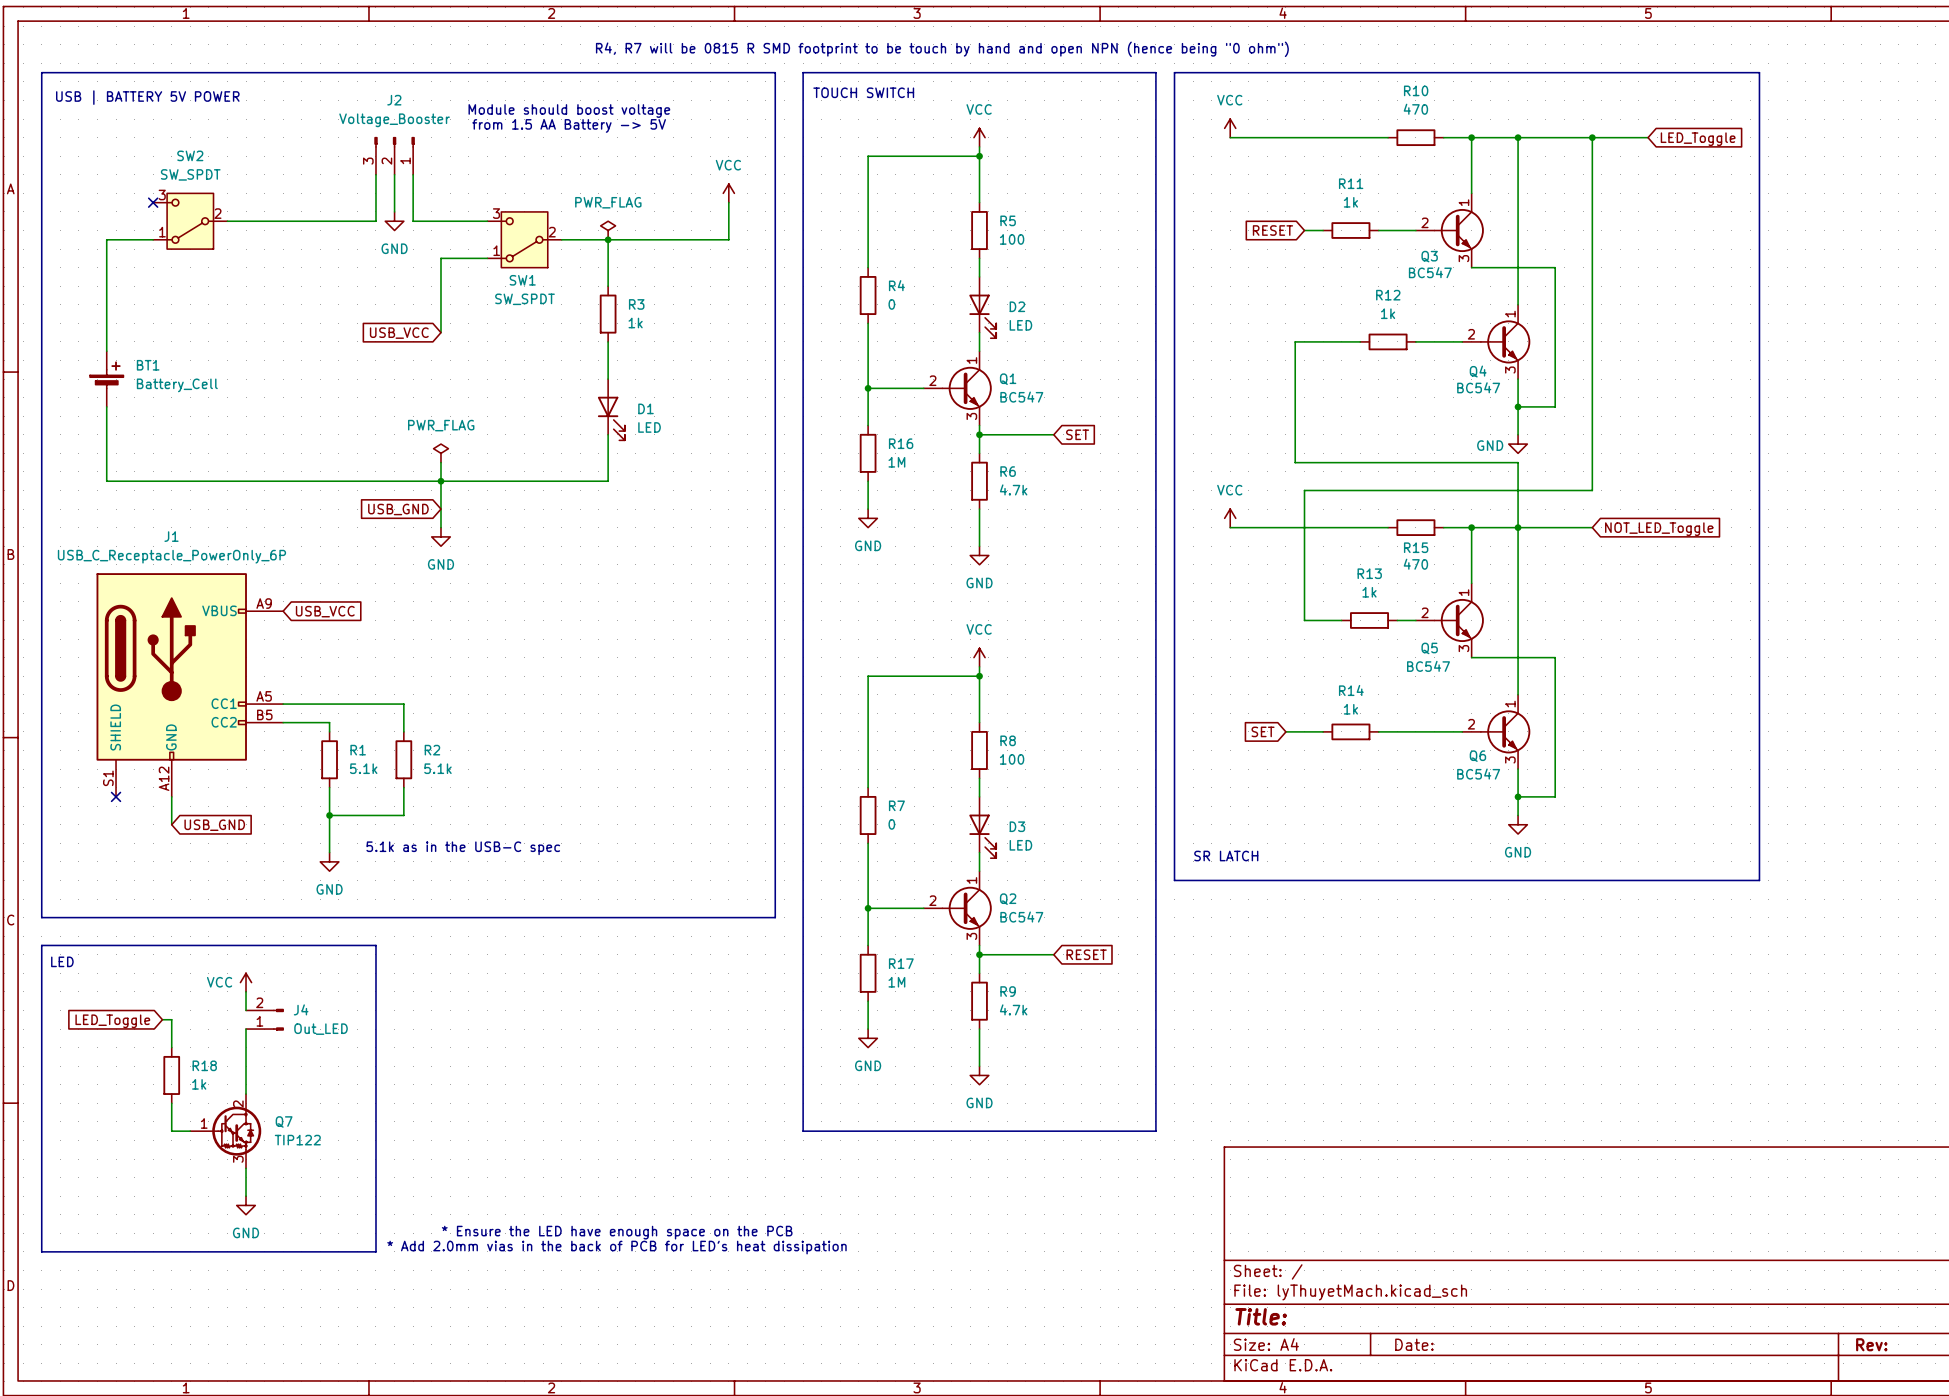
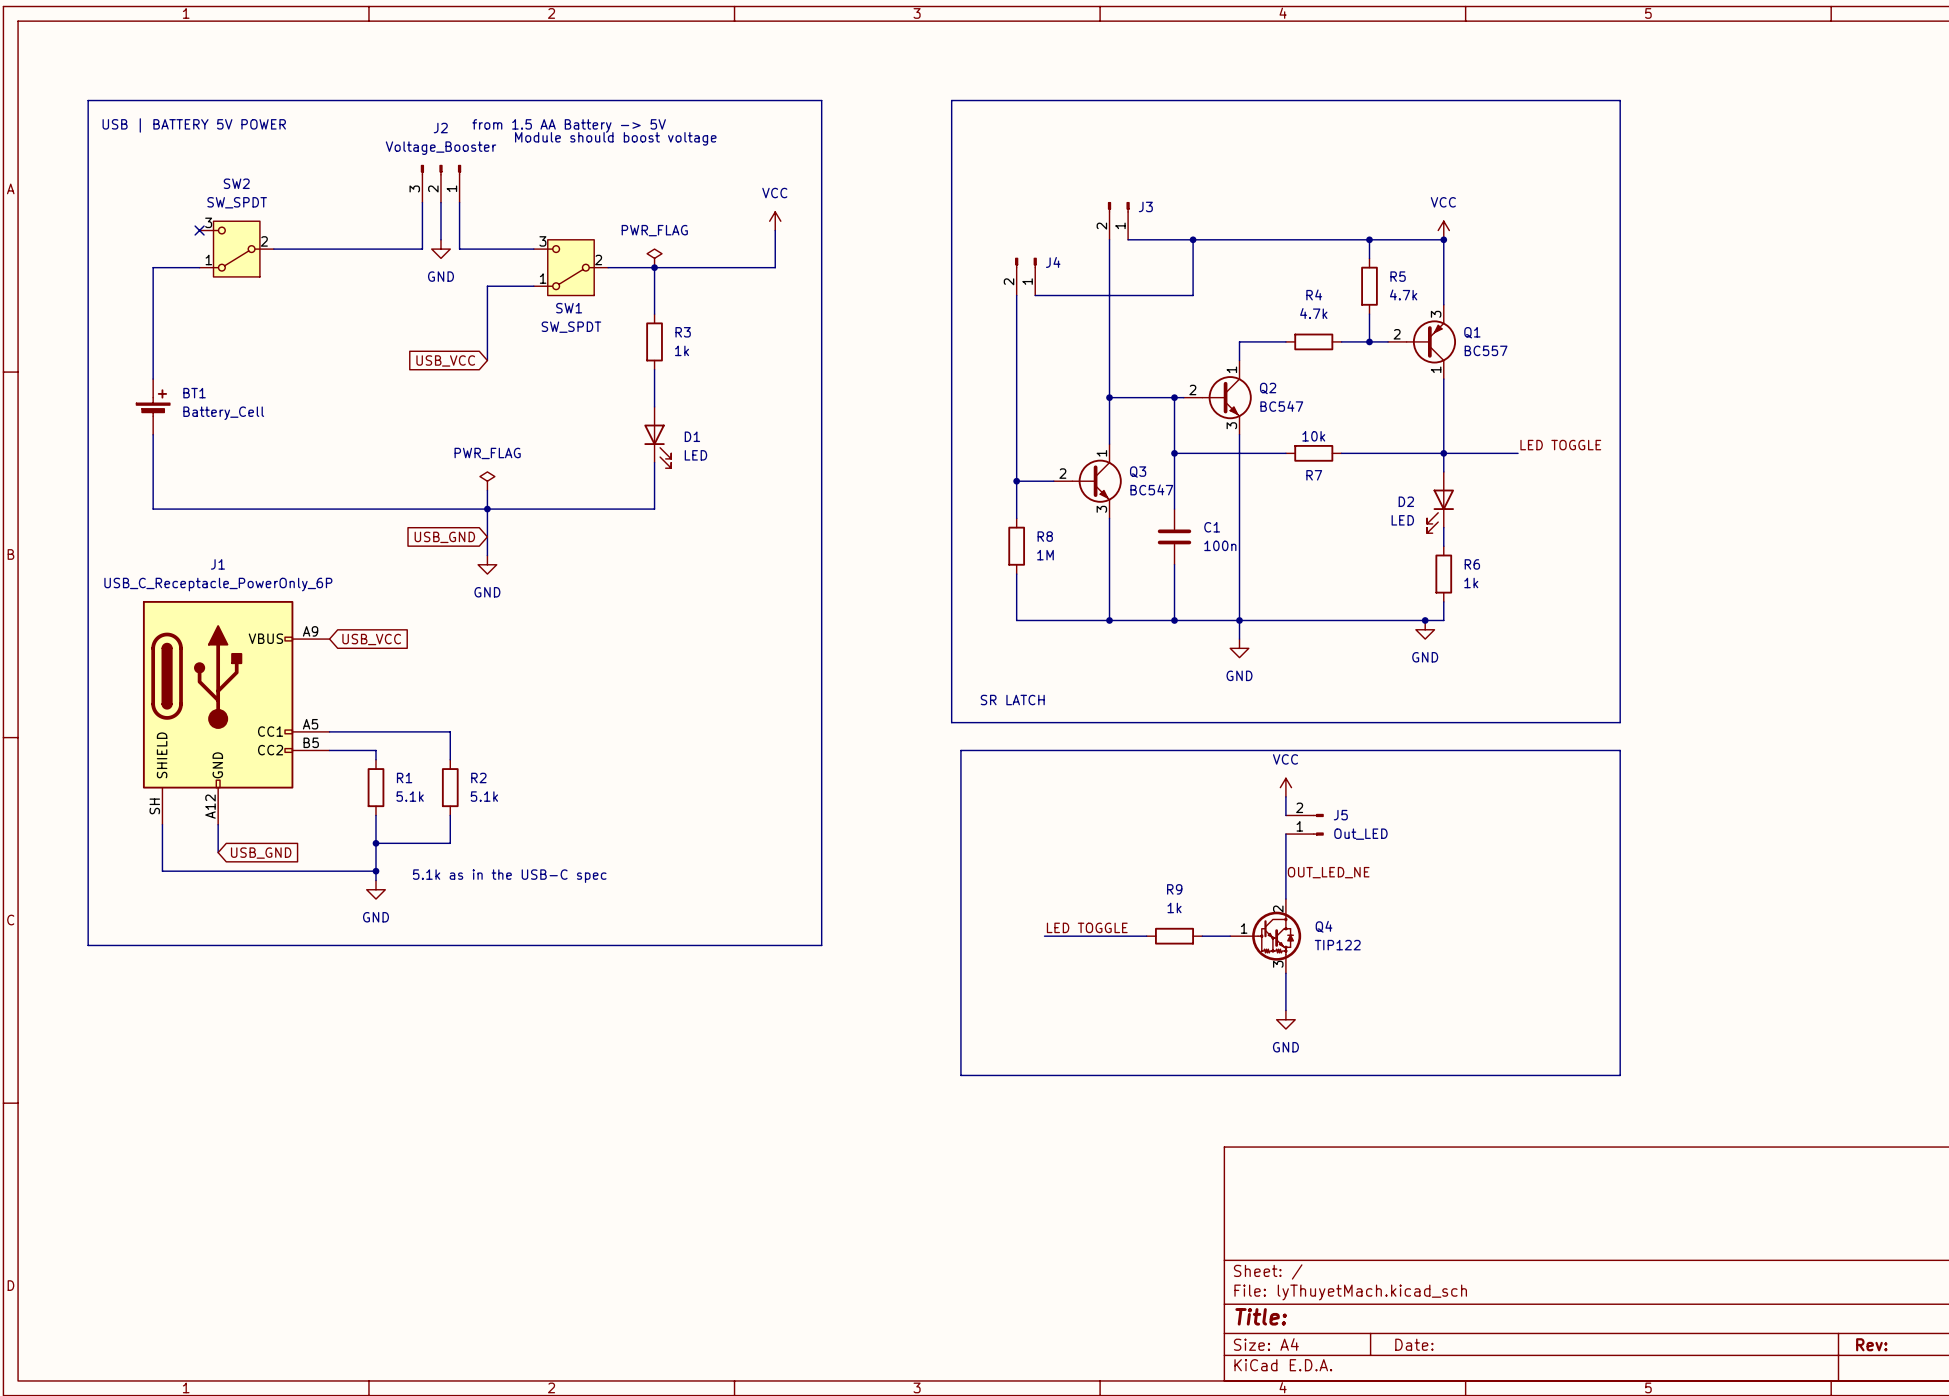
text: R4, R7 will be 0815 R SMD footprint to be touch by hand and open NPN (hence being "0 ohm") (942, 49) -> none
line: (41, 72) (775, 72) (775, 917) (41, 917) (41, 72) -> none
line: (803, 72) (1155, 72) (1155, 1131) (803, 1131) (803, 72) -> none
line: (1174, 72) (1759, 72) (1759, 880) (1174, 880) (1174, 72) -> none
text: TOUCH SWITCH (863, 92) -> none
text position: USB | BATTERY 5V POWER (147, 97) -> USB | BATTERY 5V POWER (194, 125)
line: none -> (951, 100) (1620, 100) (1620, 722) (951, 722) (951, 100)
text position: Module should boost voltage (569, 110) -> Module should boost voltage (615, 138)
power symbol: VCC (1230, 128) -> none
power symbol: VCC (979, 137) -> none
wire: (1230, 137) (1388, 137) -> none
R10: 470 (1415, 137) -> none
wire: (1443, 137) (1648, 137) -> none
wire: (1471, 137) (1471, 193) -> none
junction: (1471, 137) -> none
wire: (1518, 137) (1518, 304) -> none
junction: (1518, 137) -> none
wire: (1592, 137) (1592, 490) (1304, 490) (1304, 620) -> (1016, 574) (1016, 620) (1304, 620)
junction: (1592, 137) -> none
global label: LED_Toggle (1698, 139) -> none
wire: (979, 146) (979, 202) -> none
J2 position: (394, 155) -> (440, 183)
wire: (979, 156) (868, 156) (868, 267) -> none
junction: (979, 156) -> none
wire: (375, 174) (375, 221) (227, 221) -> (422, 202) (422, 249) (273, 249)
wire: (394, 174) (394, 211) -> (440, 202) (440, 239)
wire: (413, 174) (413, 221) (487, 221) -> (459, 202) (459, 249) (533, 249)
power symbol position: VCC (728, 193) -> VCC (775, 221)
no-connect mark: (153, 202) -> none
wire: (728, 202) (728, 239) (561, 239) -> (775, 230) (775, 267) (608, 267)
J3: none -> (1118, 220)
SW2 position: (190, 221) -> (236, 249)
power symbol position: GND (394, 221) -> GND (440, 249)
no-connect mark: none -> (199, 230)
power symbol position: PWR_FLAG (608, 230) -> PWR_FLAG (654, 258)
R5 position: (979, 230) -> (1369, 286)
global label: RESET (1272, 230) -> none
wire: (1304, 230) (1323, 230) -> none
R11: 1k (1350, 230) -> none
wire: (1378, 230) (1415, 230) -> none
power symbol: none -> VCC (1443, 230)
Q3 position: (1449, 230) -> (1087, 481)
wire: (153, 239) (106, 239) (106, 351) -> (199, 267) (153, 267) (153, 379)
SW1 position: (524, 239) -> (570, 267)
wire: (608, 239) (608, 286) -> (654, 267) (654, 314)
junction: (608, 239) -> none
R5 value: 100 (1012, 239) -> 4.7k (1403, 294)
wire: none -> (1109, 239) (1109, 444)
wire: none -> (1128, 239) (1443, 239) (1443, 304)
wire: none -> (1193, 239) (1193, 295) (1035, 295)
junction: none -> (1193, 239)
wire: none -> (1369, 239) (1369, 258)
junction: none -> (1369, 239)
junction: none -> (1443, 239)
Q3 name position: Q3 (1429, 256) -> Q3 (1138, 472)
wire: (487, 258) (440, 258) (440, 332) -> (533, 286) (487, 286) (487, 360)
wire: (979, 258) (979, 276) -> none
junction: none -> (654, 267)
wire: (1471, 267) (1555, 267) (1555, 406) (1518, 406) -> none
Q3 value position: BC547 (1430, 272) -> BC547 (1151, 489)
R4 name position: R4 (896, 285) -> R4 (1314, 294)
R4 rotation: 0° (868, 295) -> 90° clockwise (1313, 341)
R4 position: (868, 295) -> (1313, 341)
wire: none -> (1016, 295) (1016, 518)
R4 value: 0 (891, 304) -> 4.7k (1313, 313)
Q4 symbol: [1462, 304, 1531, 380] -> [1230, 899, 1302, 974]
D2 position: (982, 307) -> (1440, 502)
R3 position: (608, 314) -> (654, 341)
wire: none -> (1369, 314) (1369, 341)
D2 flip: as is (982, 316) -> left-right (1440, 511)
wire: (868, 323) (868, 425) -> none
wire: (979, 332) (979, 351) -> none
global label position: USB_VCC (399, 333) -> USB_VCC (445, 360)
wire: (608, 341) (608, 379) -> (654, 369) (654, 406)
wire: none -> (1285, 341) (1239, 341) (1239, 360)
wire: (1341, 341) (1295, 341) (1295, 462) (1518, 462) (1518, 694) -> none
wire: none -> (1360, 341) (1388, 341)
junction: none -> (1369, 341)
R12: 1k (1388, 341) -> none
wire: (1415, 341) (1462, 341) -> none
Q1 symbol: [923, 351, 992, 426] -> [1388, 304, 1457, 380]
Q4 name position: Q4 (1478, 371) -> Q4 (1324, 926)
BT1 position: (106, 379) -> (153, 406)
wire: none -> (1443, 379) (1443, 471)
wire: (1518, 379) (1518, 434) -> none
Q4 value: BC547 (1478, 387) -> TIP122 (1337, 945)
wire: (868, 388) (923, 388) -> none
junction: (868, 388) -> none
Q1 value: BC547 (1021, 397) -> BC557 (1486, 350)
junction: none -> (1109, 397)
junction: none -> (1174, 397)
wire: (106, 406) (106, 481) (608, 481) (608, 434) -> (153, 434) (153, 509) (654, 509) (654, 462)
junction: (1518, 406) -> none
D1 position: (611, 409) -> (657, 437)
wire: (979, 425) (979, 453) -> none
wire: (979, 434) (1053, 434) -> (1109, 397) (1183, 397)
junction: (979, 434) -> none
global label: SET (1077, 434) -> none
wire: none -> (1239, 434) (1239, 639)
power symbol: GND (1518, 444) -> none
label: none -> LED TOGGLE (1560, 445)
power symbol position: PWR_FLAG (440, 453) -> PWR_FLAG (487, 481)
R16: 1M (868, 453) -> none
wire: none -> (1174, 453) (1285, 453)
junction: none -> (1174, 453)
wire: none -> (1341, 453) (1518, 453)
junction: none -> (1443, 453)
wire: (440, 462) (440, 527) -> (487, 490) (487, 555)
junction: (440, 481) -> none
wire: (868, 481) (868, 509) -> none
R6 position: (979, 481) -> (1443, 574)
wire: none -> (1016, 481) (1053, 481)
junction: none -> (1016, 481)
R6 value: 4.7k (1013, 489) -> 1k (1471, 583)
global label position: USB_GND (398, 509) -> USB_GND (444, 537)
junction: none -> (487, 509)
wire: (979, 509) (979, 546) -> none
power symbol: GND (868, 518) -> none
wire: none -> (1109, 518) (1109, 620)
power symbol: VCC (1230, 518) -> none
wire: (1230, 527) (1388, 527) -> none
R15: 470 (1415, 527) -> none
wire: (1443, 527) (1592, 527) -> (1443, 527) (1443, 546)
wire: (1471, 527) (1471, 583) -> none
junction: (1471, 527) -> none
junction: (1518, 527) -> none
global label: NOT_LED_Toggle (1659, 529) -> none
power symbol position: GND (440, 536) -> GND (487, 564)
C1: none -> 100n (1174, 536)
power symbol: GND (979, 555) -> none
global label position: USB_VCC (325, 611) -> USB_VCC (371, 639)
junction: none -> (1109, 620)
junction: none -> (1174, 620)
junction: none -> (1239, 620)
wire: none -> (1341, 620) (1397, 620)
R13: 1k (1369, 620) -> none
junction: none -> (1425, 620)
Q5: BC547 (1449, 620) -> none
power symbol: none -> GND (1425, 629)
power symbol: none -> GND (1239, 648)
power symbol: VCC (979, 657) -> none
wire: (1471, 657) (1555, 657) (1555, 796) (1518, 796) -> none
wire: (979, 666) (979, 722) -> none
wire: (979, 676) (868, 676) (868, 787) -> none
junction: (979, 676) -> none
J1 position: (189, 685) -> (236, 712)
text: none -> SR LATCH (1012, 700)
wire: (283, 704) (403, 704) (403, 731) -> none
wire: (283, 722) (329, 722) (329, 731) -> (450, 759) (450, 731) (329, 731)
global label: SET (1263, 731) -> none
wire: (1285, 731) (1323, 731) -> none
R14: 1k (1350, 731) -> none
wire: (1378, 731) (1462, 731) -> none
Q6: BC547 (1496, 731) -> none
wire: none -> (329, 750) (375, 750) (375, 759)
line: none -> (960, 750) (1620, 750) (1620, 1075) (960, 1075) (960, 750)
R8 position: (979, 750) -> (1016, 546)
R1 position: (329, 759) -> (375, 787)
R2 position: (403, 759) -> (450, 787)
R8 value: 100 (1012, 759) -> 1M (1045, 555)
wire: (1518, 769) (1518, 815) -> none
J1 pin number: S1 (108, 778) -> SH (154, 806)
wire: (979, 778) (979, 796) -> none
wire: (329, 787) (329, 852) -> (375, 815) (375, 880)
wire: (403, 787) (403, 815) (329, 815) -> (450, 815) (450, 843) (375, 843)
power symbol: none -> VCC (1285, 787)
no-connect mark: (116, 796) -> none
wire: (171, 796) (171, 824) -> (218, 824) (218, 852)
wire: none -> (1285, 796) (1285, 815)
junction: (1518, 796) -> none
junction: (329, 815) -> none
R7 rotation: 0° (868, 815) -> 90° clockwise (1313, 453)
R7 position: (868, 815) -> (1313, 453)
wire: none -> (162, 824) (162, 871) (375, 871)
R7 value: 0 (891, 824) -> 10k (1313, 436)
J5: none -> Out_LED (1304, 824)
power symbol: GND (1518, 824) -> none
global label position: USB_GND (214, 825) -> USB_GND (261, 853)
D3: LED (982, 827) -> none
wire: none -> (1285, 834) (1285, 899)
junction: none -> (375, 843)
wire: (868, 843) (868, 945) -> none
text position: 5.1k as in the USB-C spec (463, 848) -> 5.1k as in the USB-C spec (509, 876)
wire: (979, 852) (979, 871) -> none
text: SR LATCH (1226, 856) -> none
power symbol position: GND (329, 861) -> GND (375, 889)
junction: none -> (375, 871)
label: none -> OUT_LED_NE (1328, 872)
wire: (868, 908) (923, 908) -> none
junction: (868, 908) -> none
Q2 position: (957, 908) -> (1217, 397)
label: none -> LED TOGGLE (1087, 927)
wire: none -> (1044, 936) (1146, 936)
wire: none -> (1202, 936) (1230, 936)
line: (88, 945) (41, 945) (41, 1251) (375, 1251) (375, 945) -> (88, 945) (88, 100) (821, 100) (821, 945) (375, 945)
wire: (979, 945) (979, 973) -> none
wire: (979, 954) (1053, 954) -> none
junction: (979, 954) -> none
global label: RESET (1086, 954) -> none
text: LED (62, 961) -> none
R17: 1M (868, 973) -> none
wire: none -> (1285, 973) (1285, 1010)
power symbol: VCC (246, 982) -> none
wire: (246, 991) (246, 1010) -> none
R9 name position: R9 (1008, 991) -> R9 (1174, 889)
wire: (868, 1001) (868, 1029) -> none
R9 rotation: 0° (979, 1001) -> 90° clockwise (1174, 936)
R9 position: (979, 1001) -> (1174, 936)
R9 value: 4.7k (1013, 1009) -> 1k (1174, 907)
wire: (162, 1019) (171, 1019) (171, 1047) -> none
J4 position: (264, 1019) -> (1025, 276)
J4 rotation: 0° (278, 1019) -> 90° counterclockwise (1025, 263)
power symbol: none -> GND (1285, 1019)
global label: LED_Toggle (112, 1021) -> none
wire: (246, 1029) (246, 1094) -> none
J4 value: Out_LED (321, 1029) -> none
wire: (979, 1029) (979, 1066) -> none
power symbol: GND (868, 1038) -> none
R18: 1k (171, 1075) -> none
power symbol: GND (979, 1075) -> none
wire: (171, 1103) (171, 1131) (190, 1131) -> none
Q7: TIP122 (225, 1131) -> none
wire: (246, 1168) (246, 1196) -> none
power symbol: GND (246, 1205) -> none
text: * Ensure the LED have enough space on the PCB (617, 1232) -> none
text: * Add 2.0mm vias in the back of PCB for LED's heat dissipation (616, 1247) -> none

